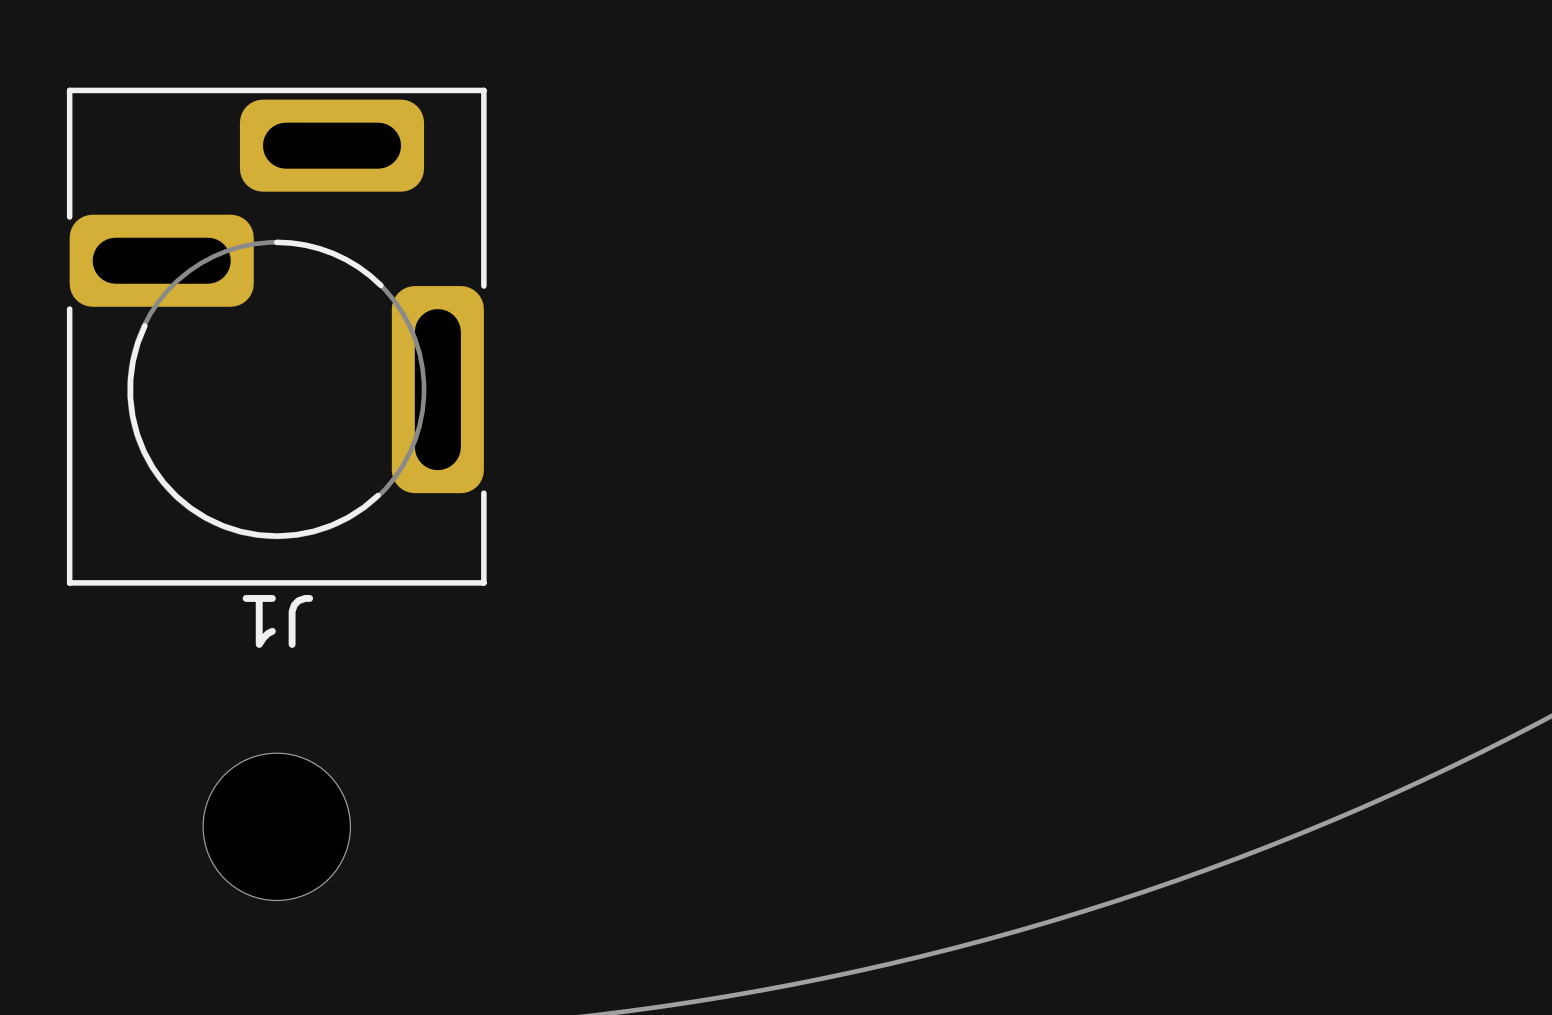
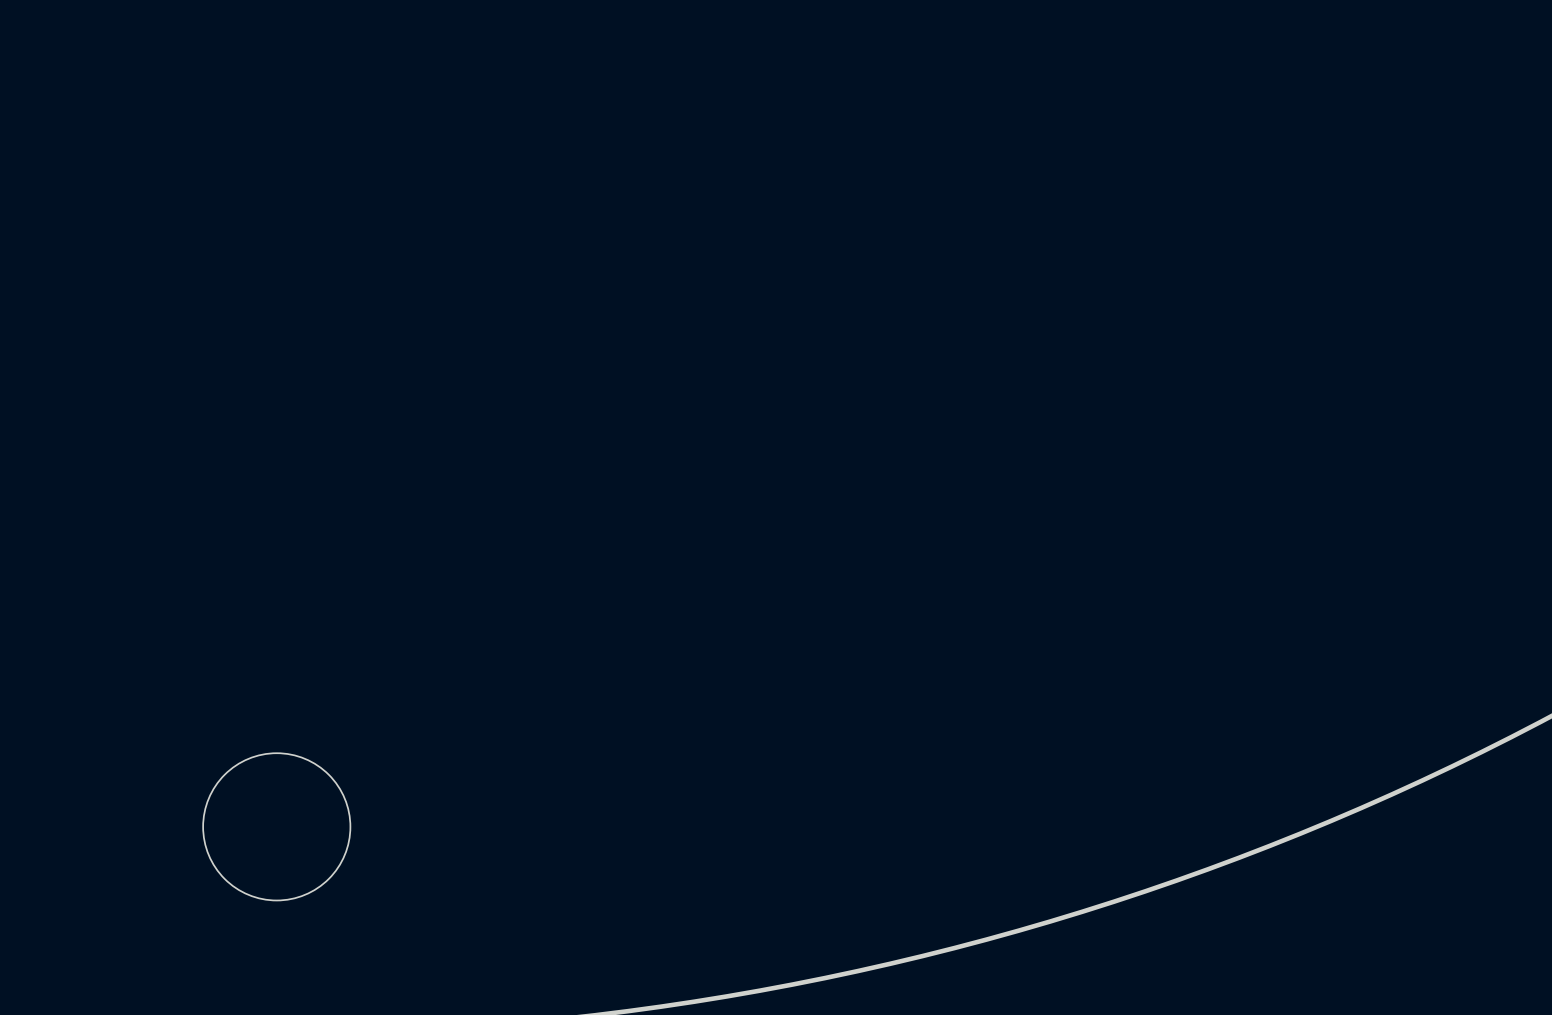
J1: (276, 336) -> none

